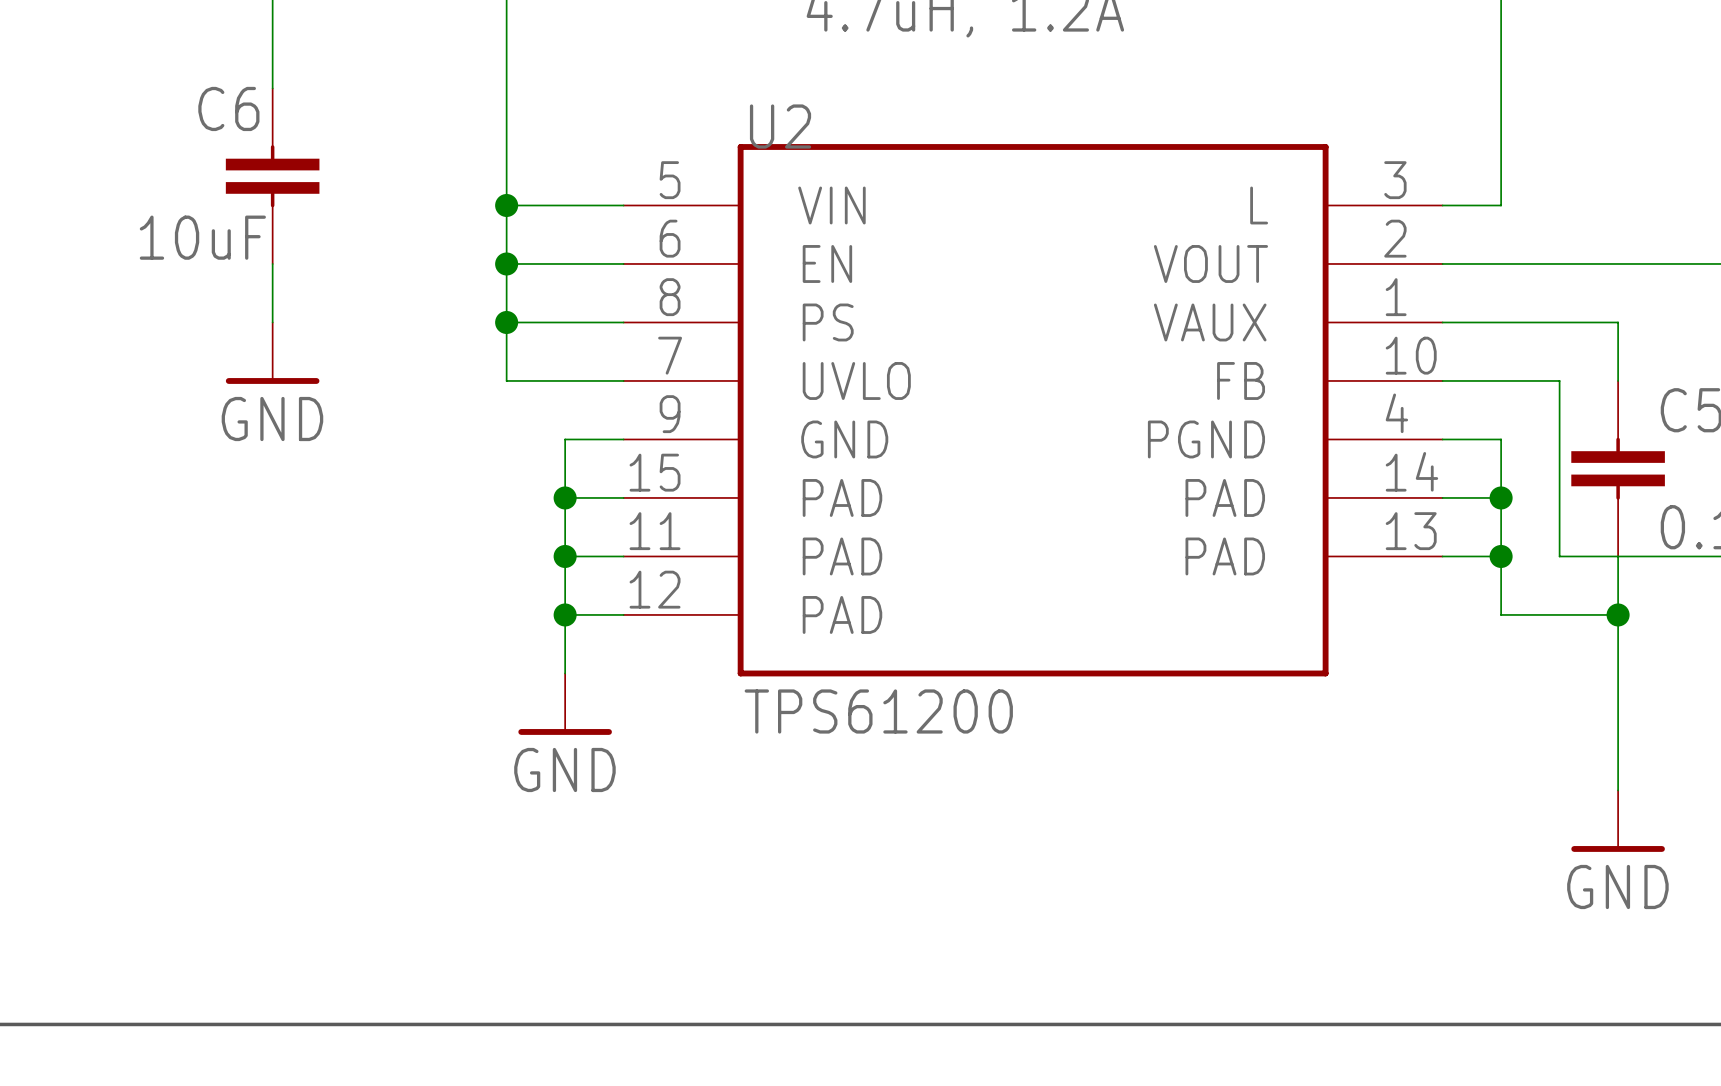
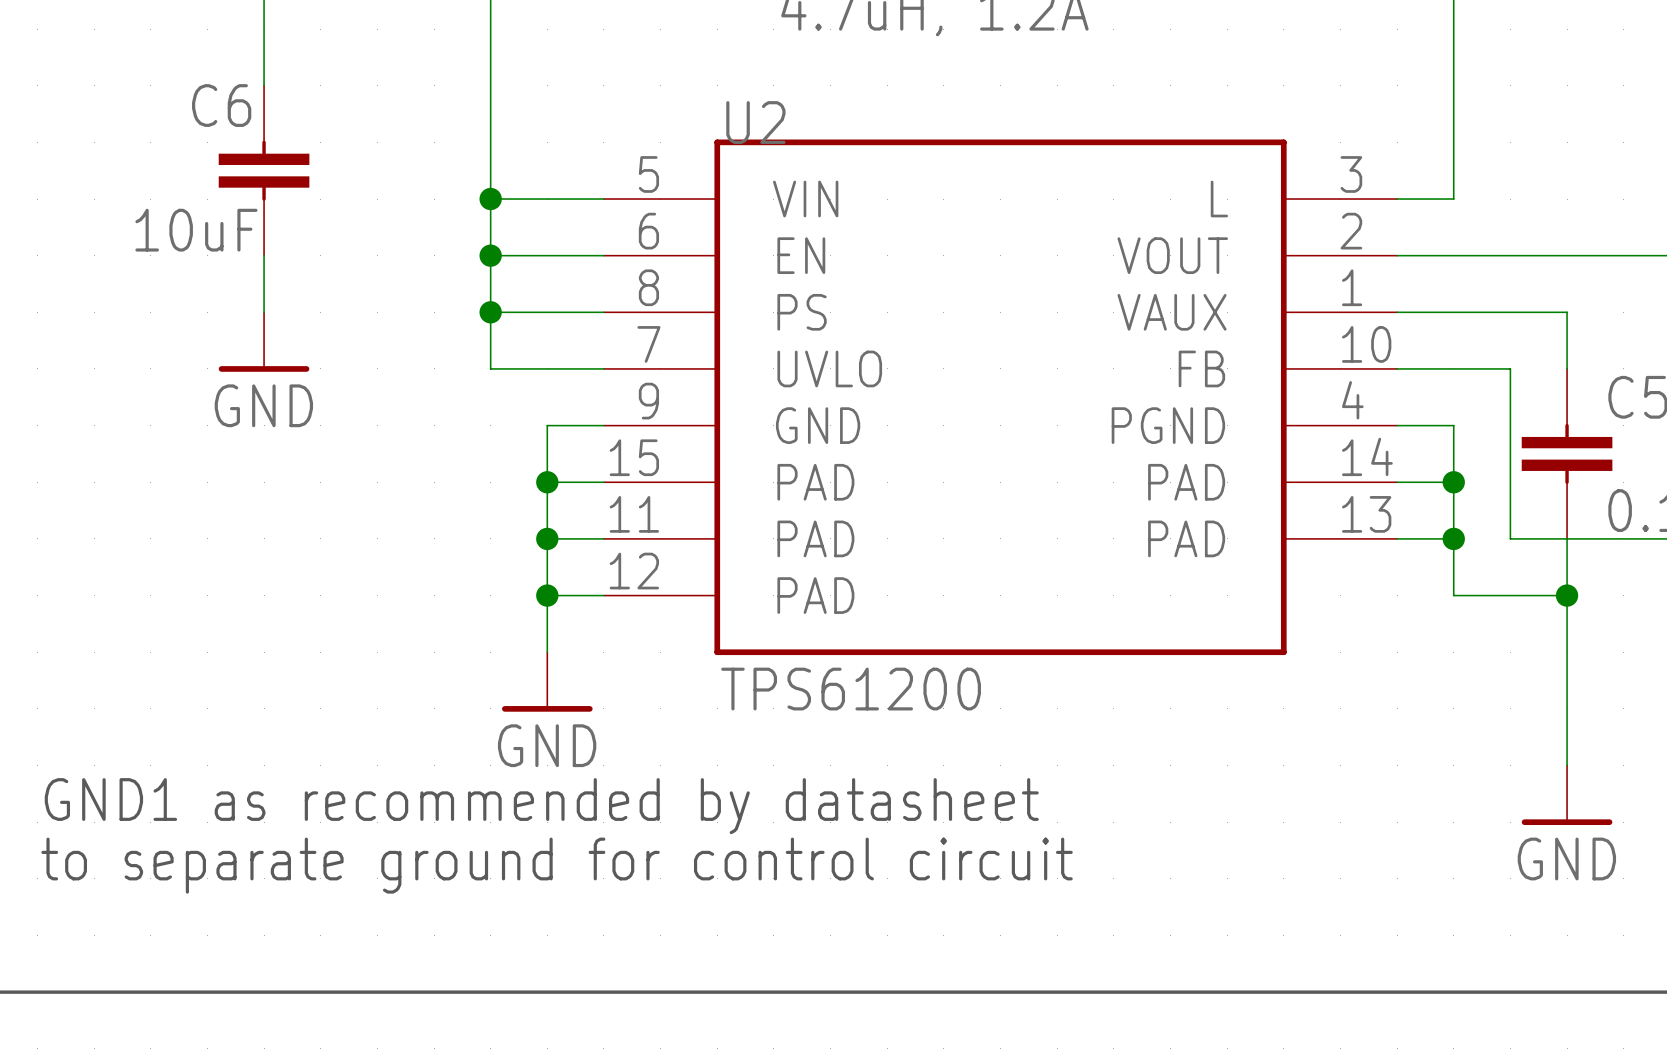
text: none -> GND1 as recommended by datasheet (541, 806)
text: none -> to separate ground for control circuit (557, 865)

